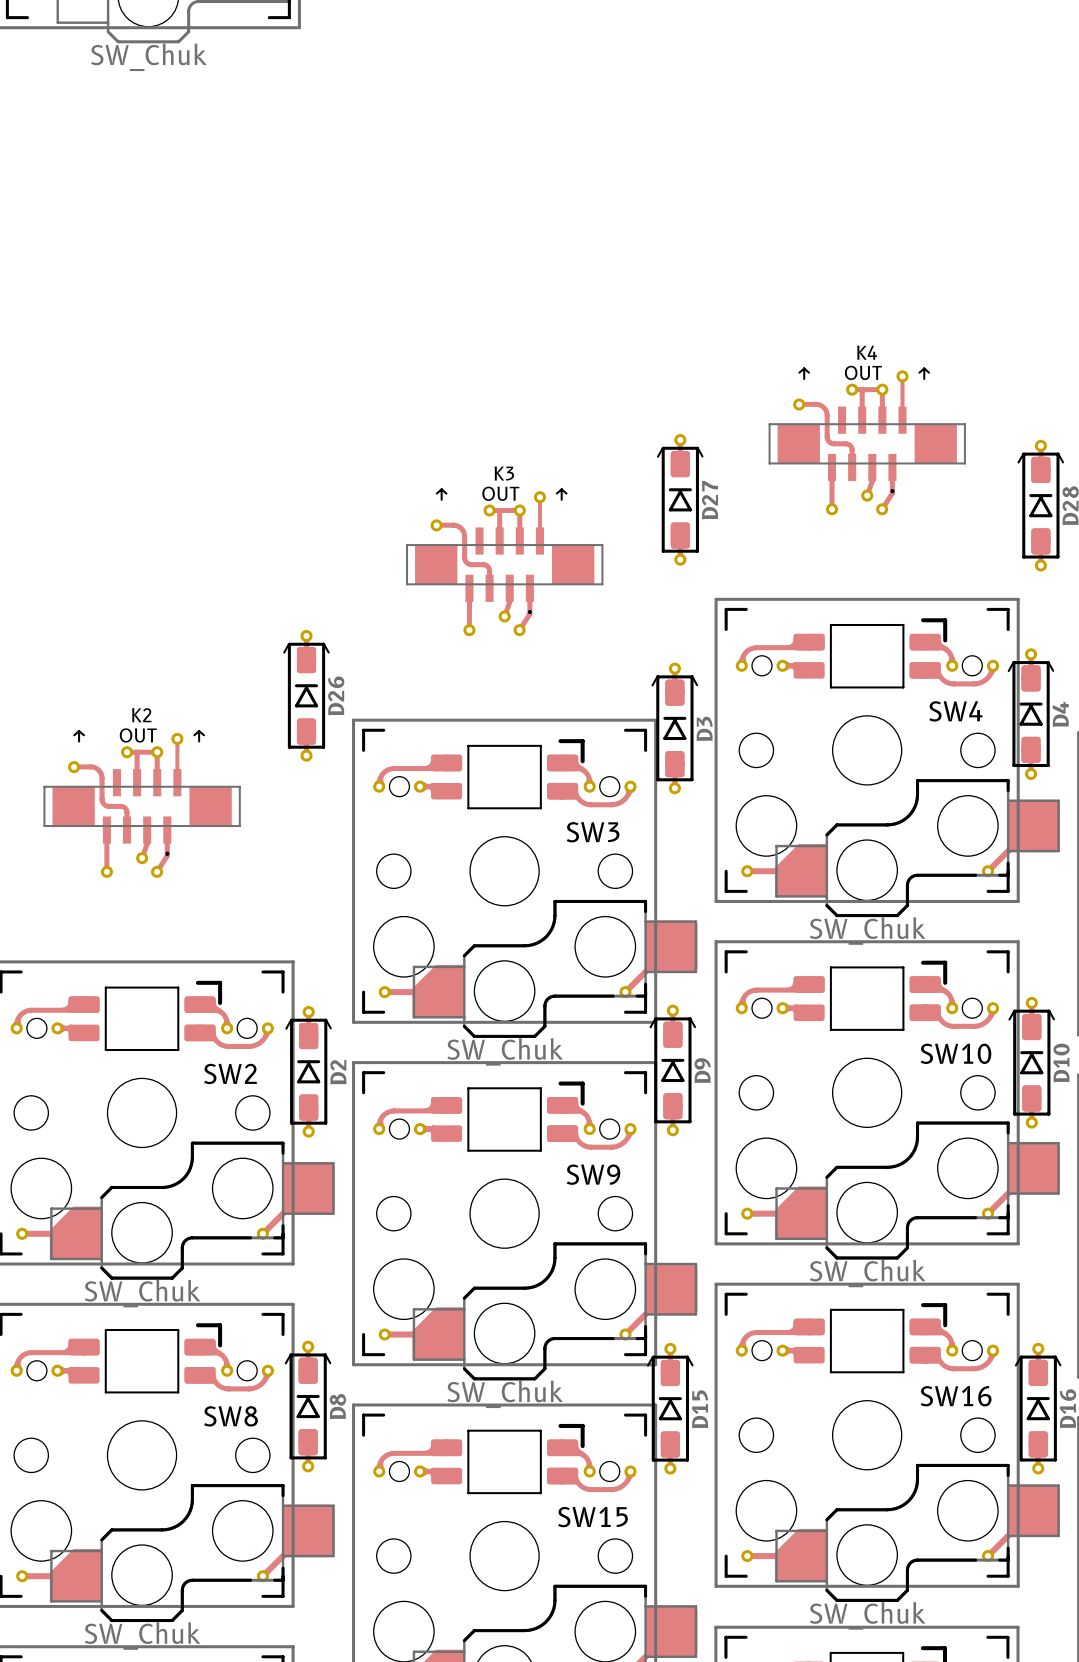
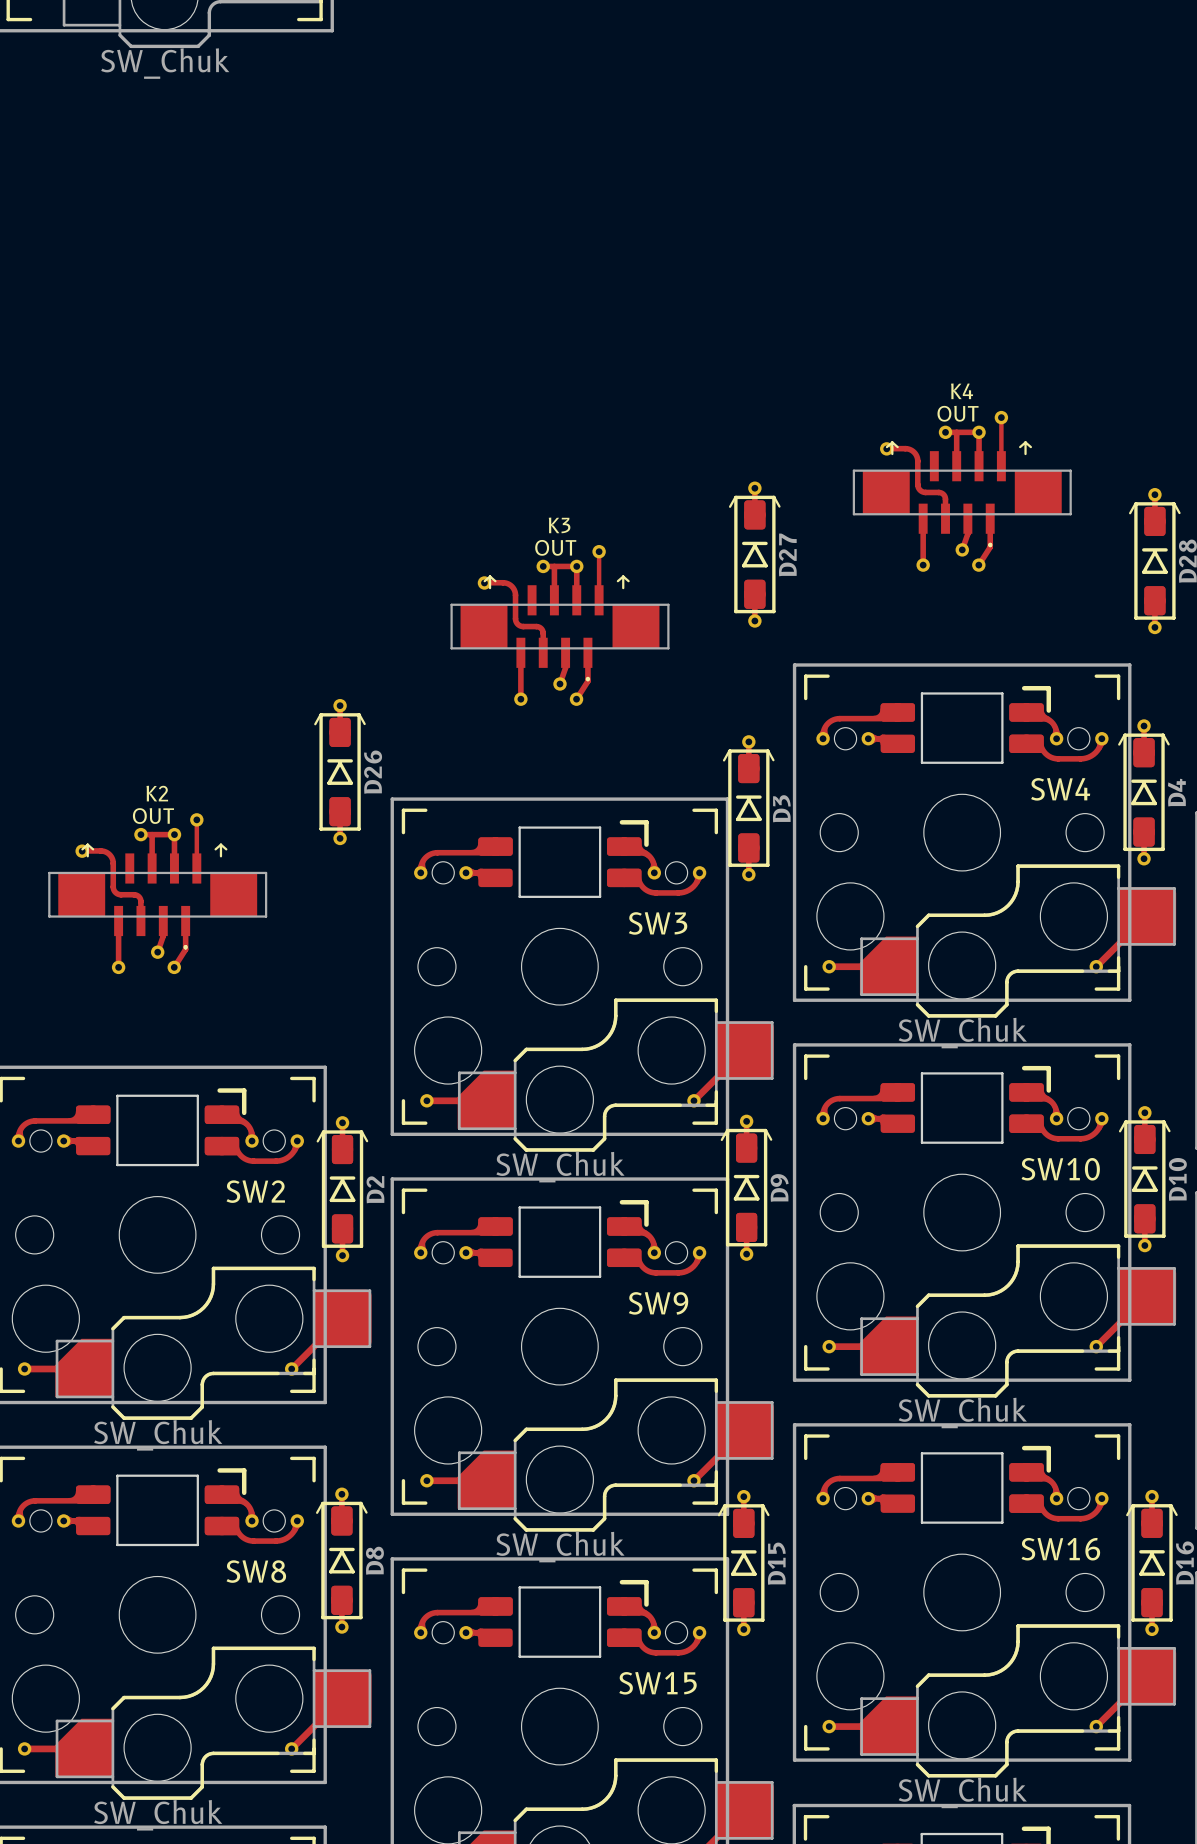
K4 footprint: [768, 367, 966, 516] -> [852, 410, 1072, 572]
K3 footprint: [406, 488, 604, 637] -> [450, 544, 670, 706]
K2 footprint: [43, 730, 241, 878] -> [48, 813, 268, 975]

